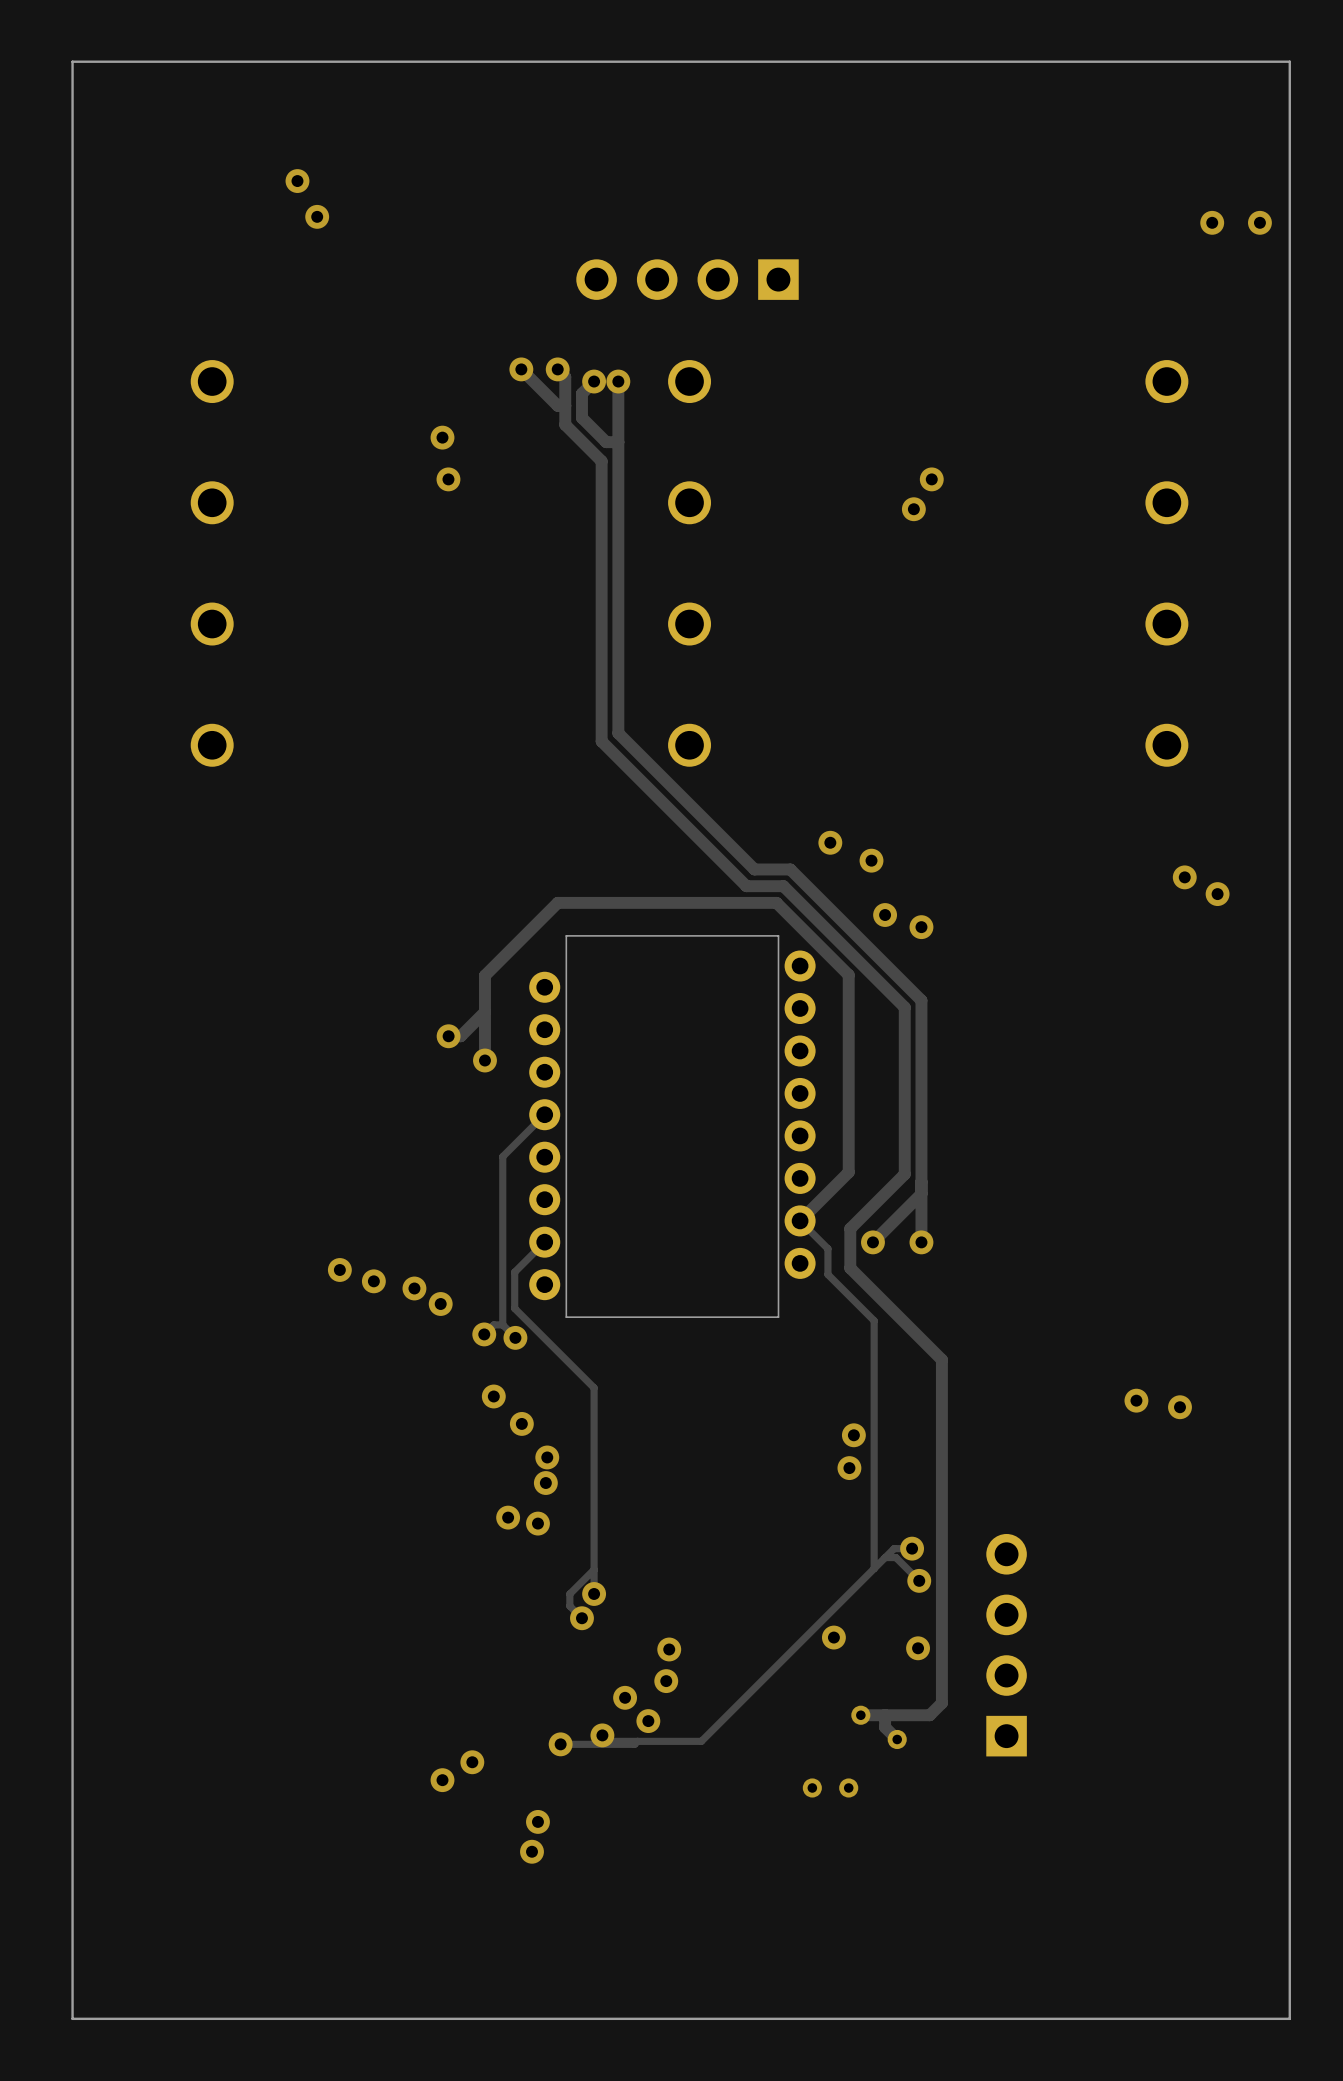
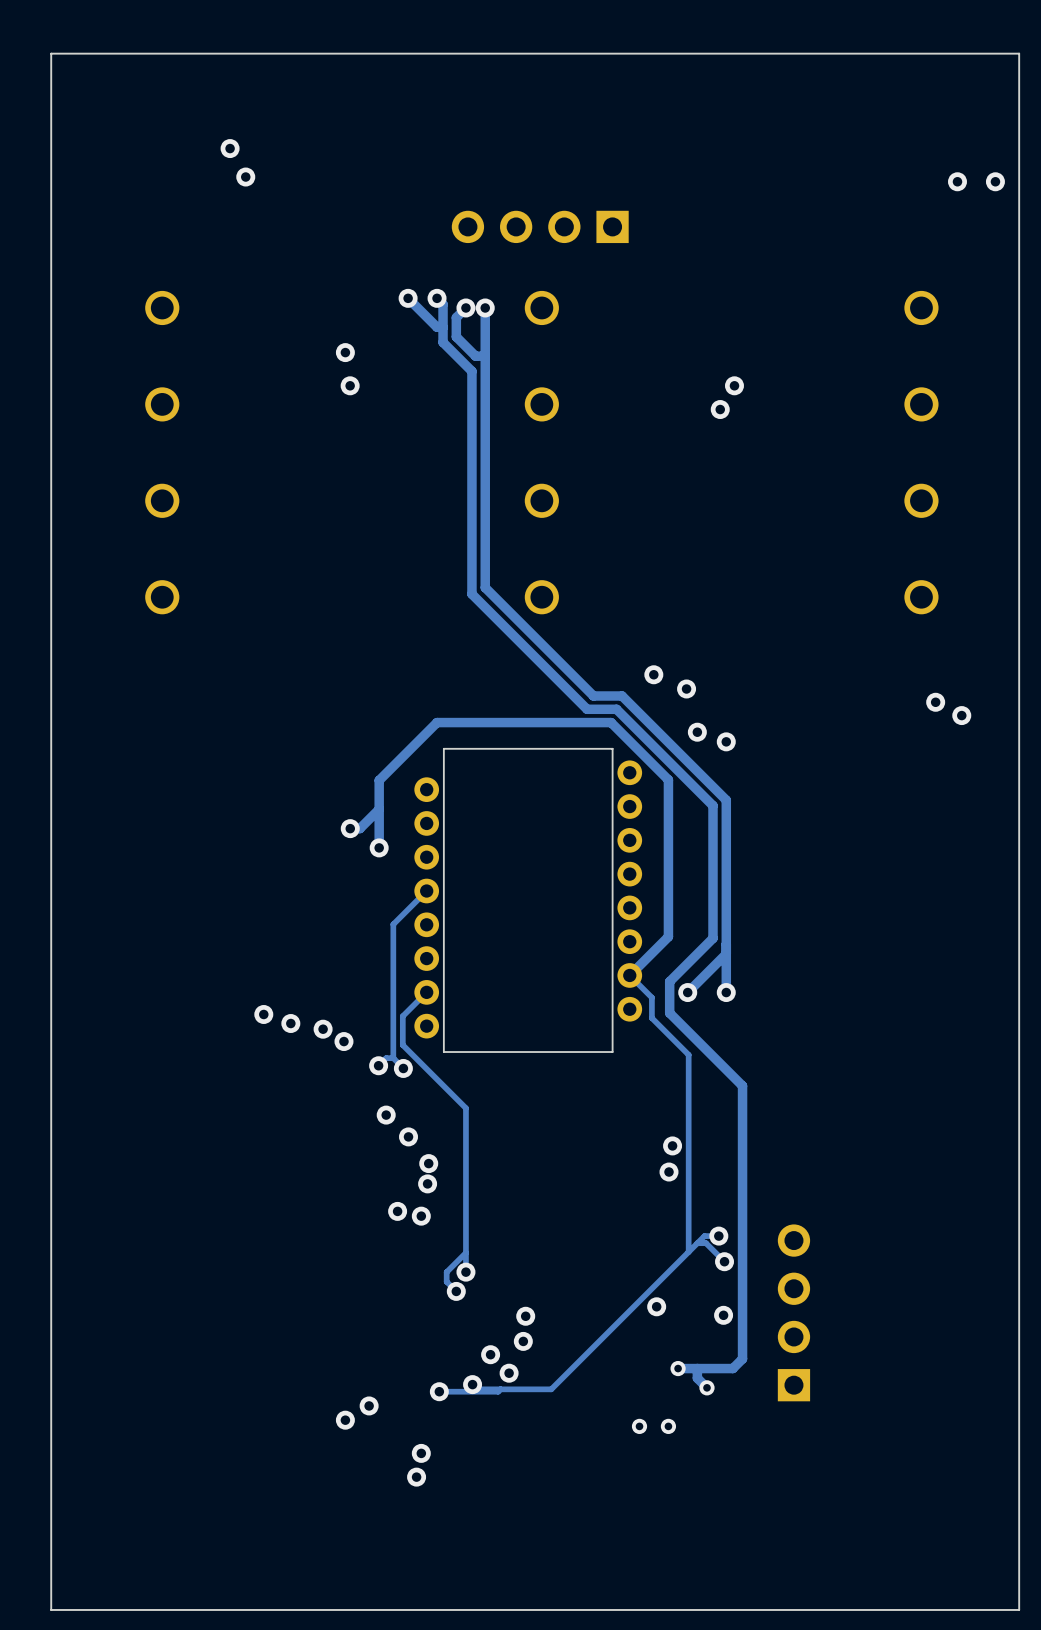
via: (1136, 1400) -> none
via: (1179, 1407) -> none

